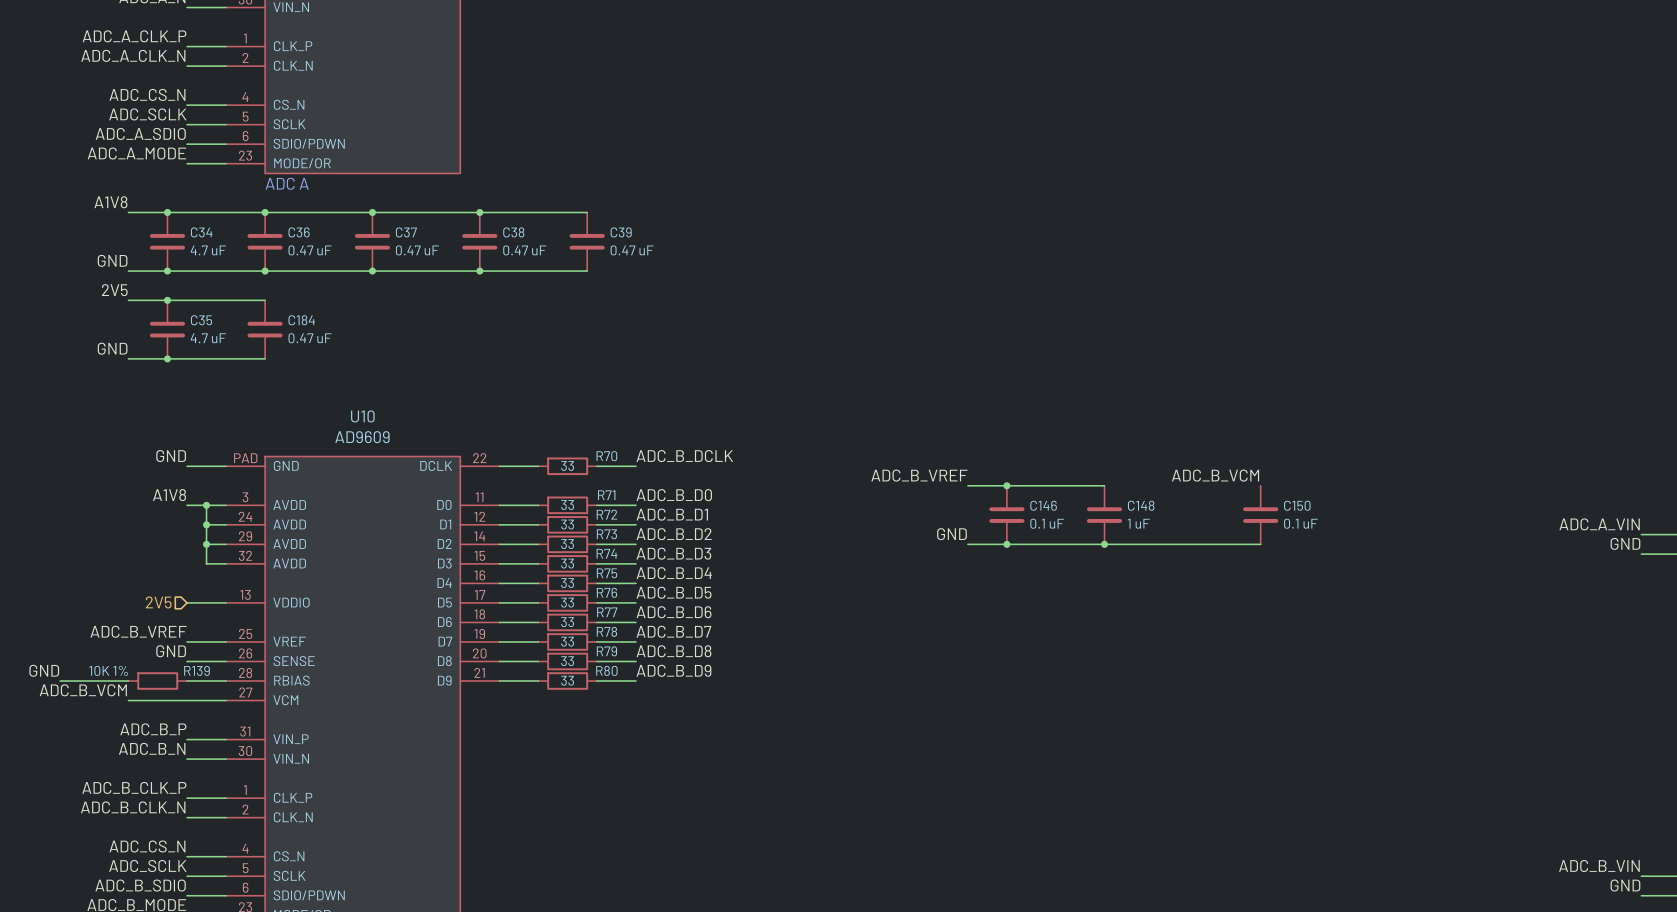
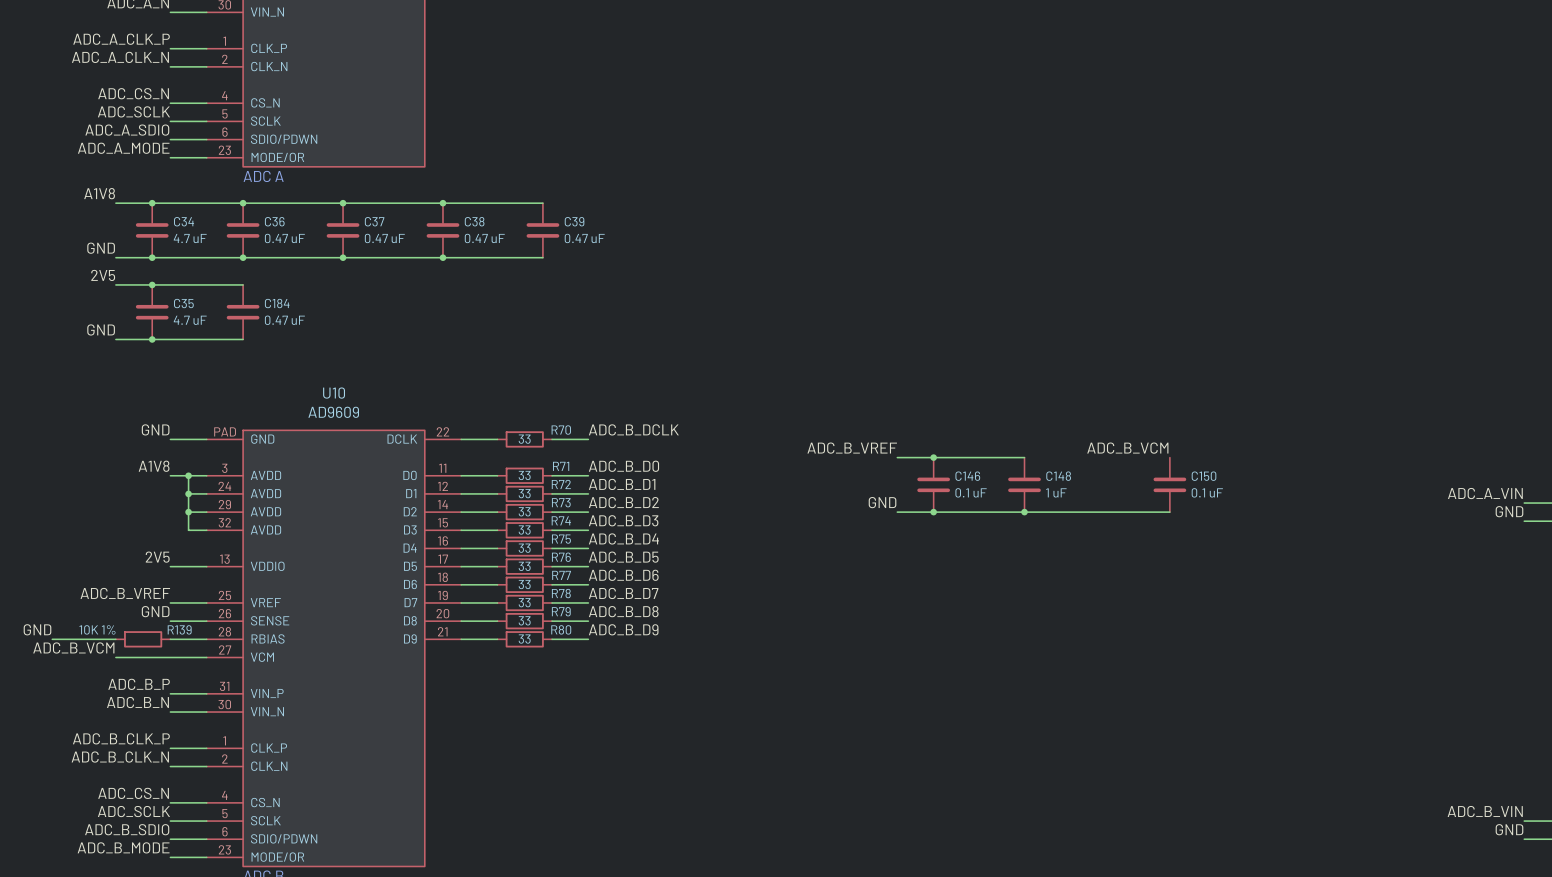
label: none -> 2V5 (157, 557)
hierarchical label: 2V5 (158, 602) -> none

